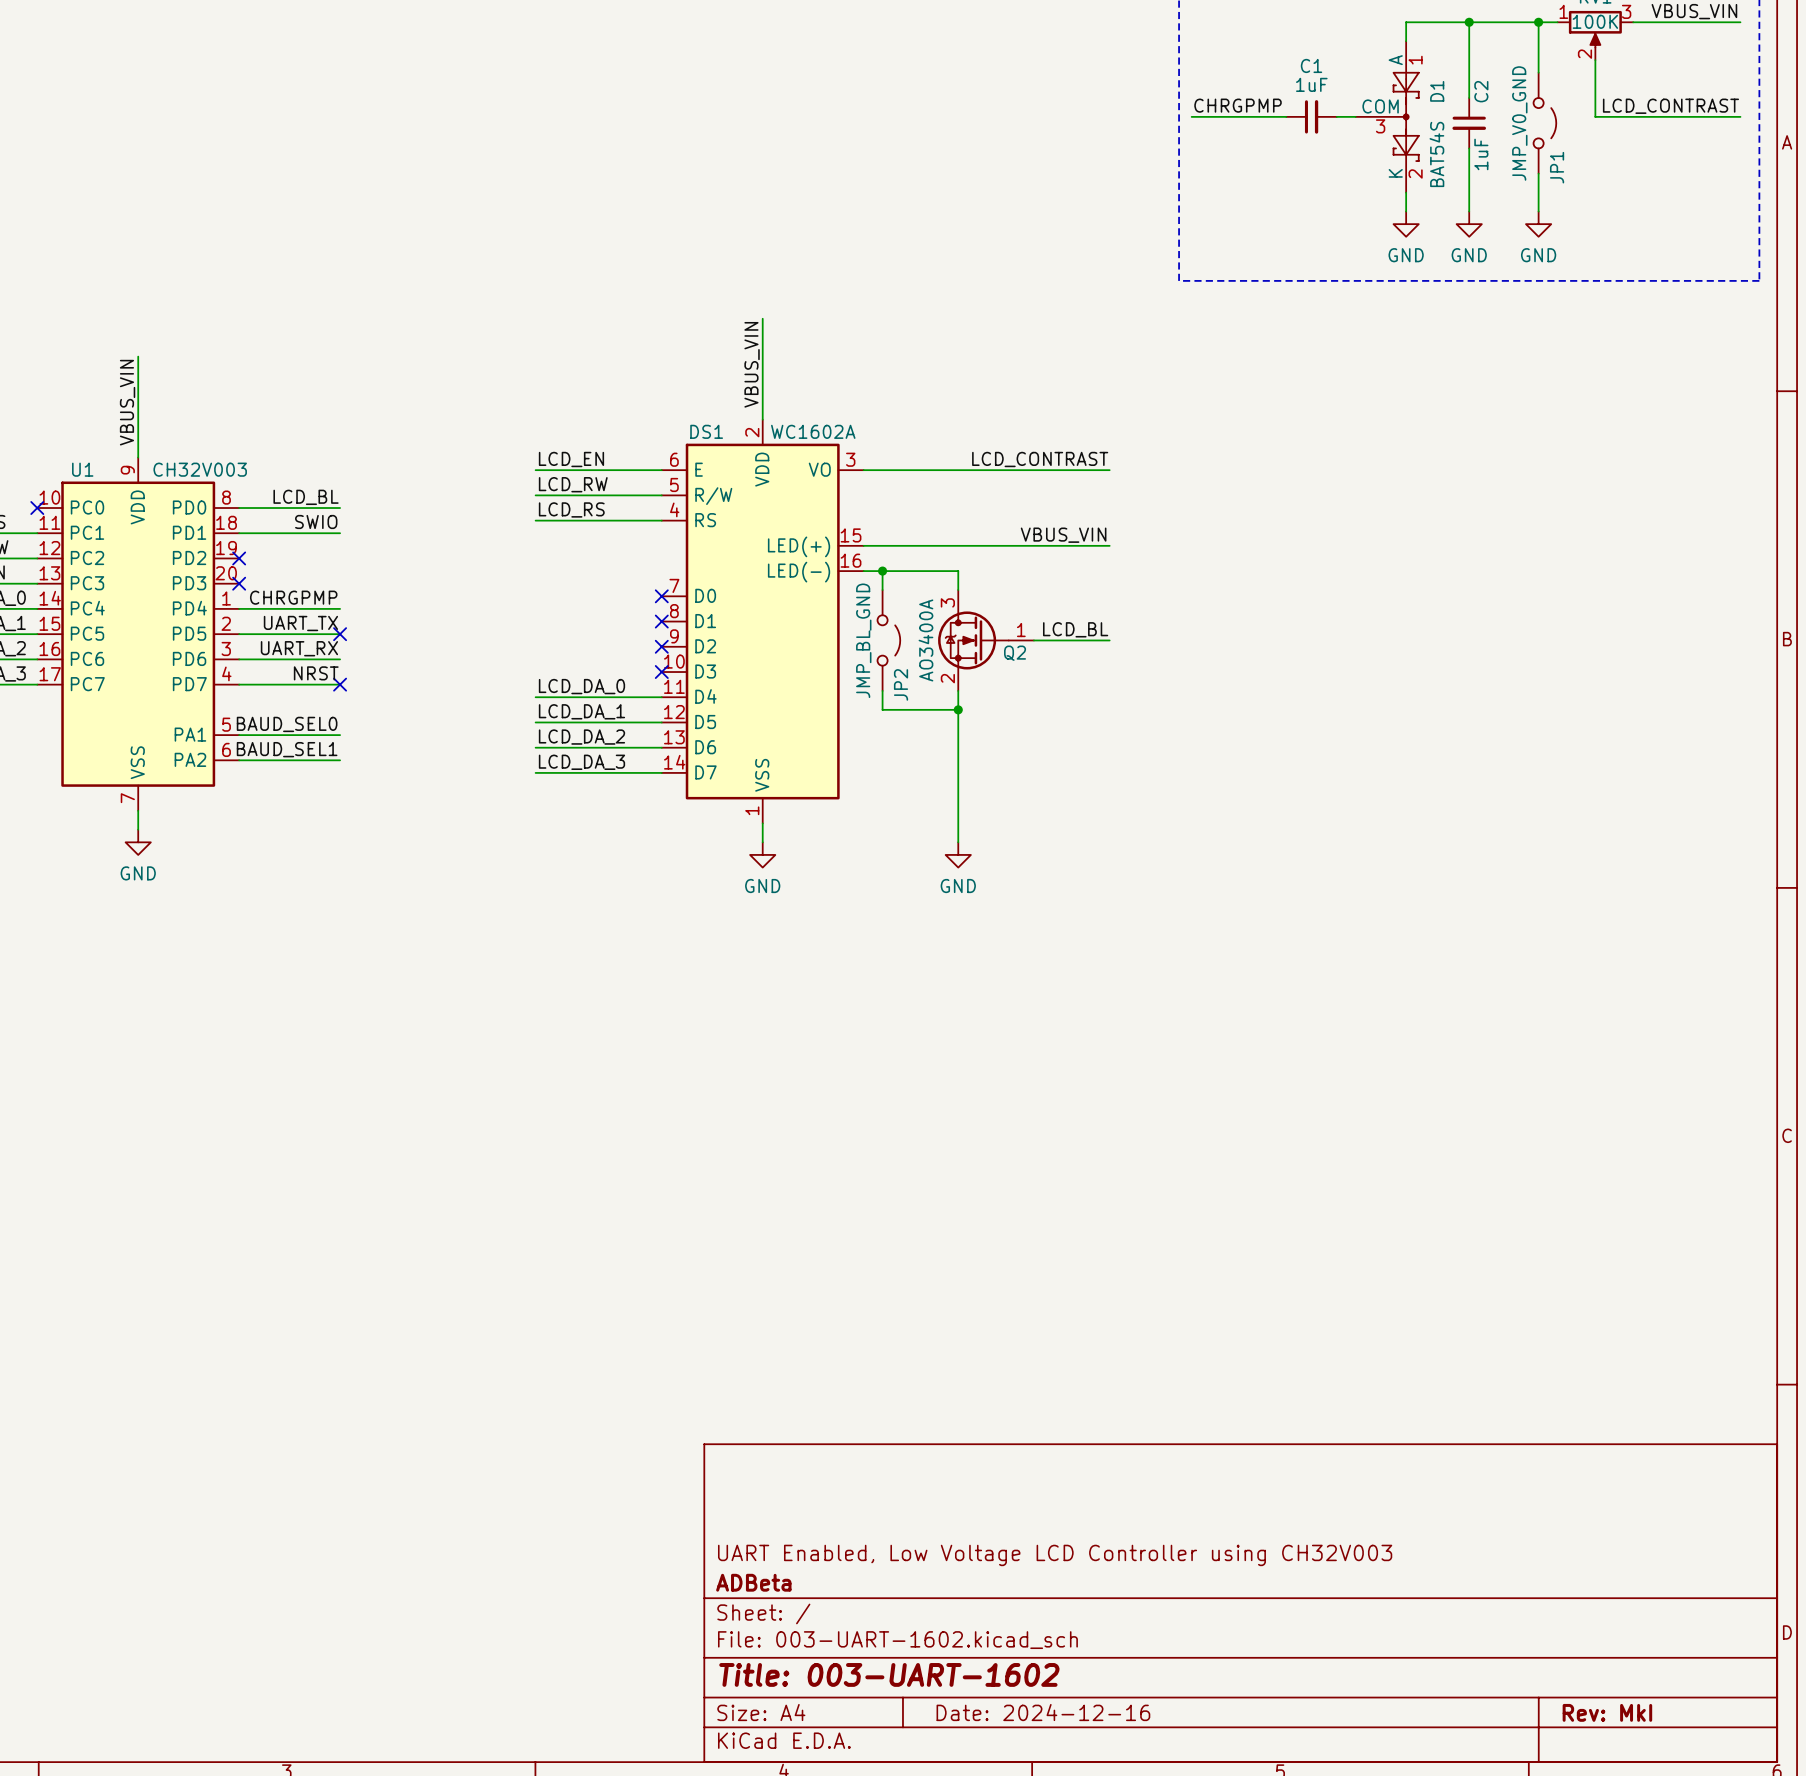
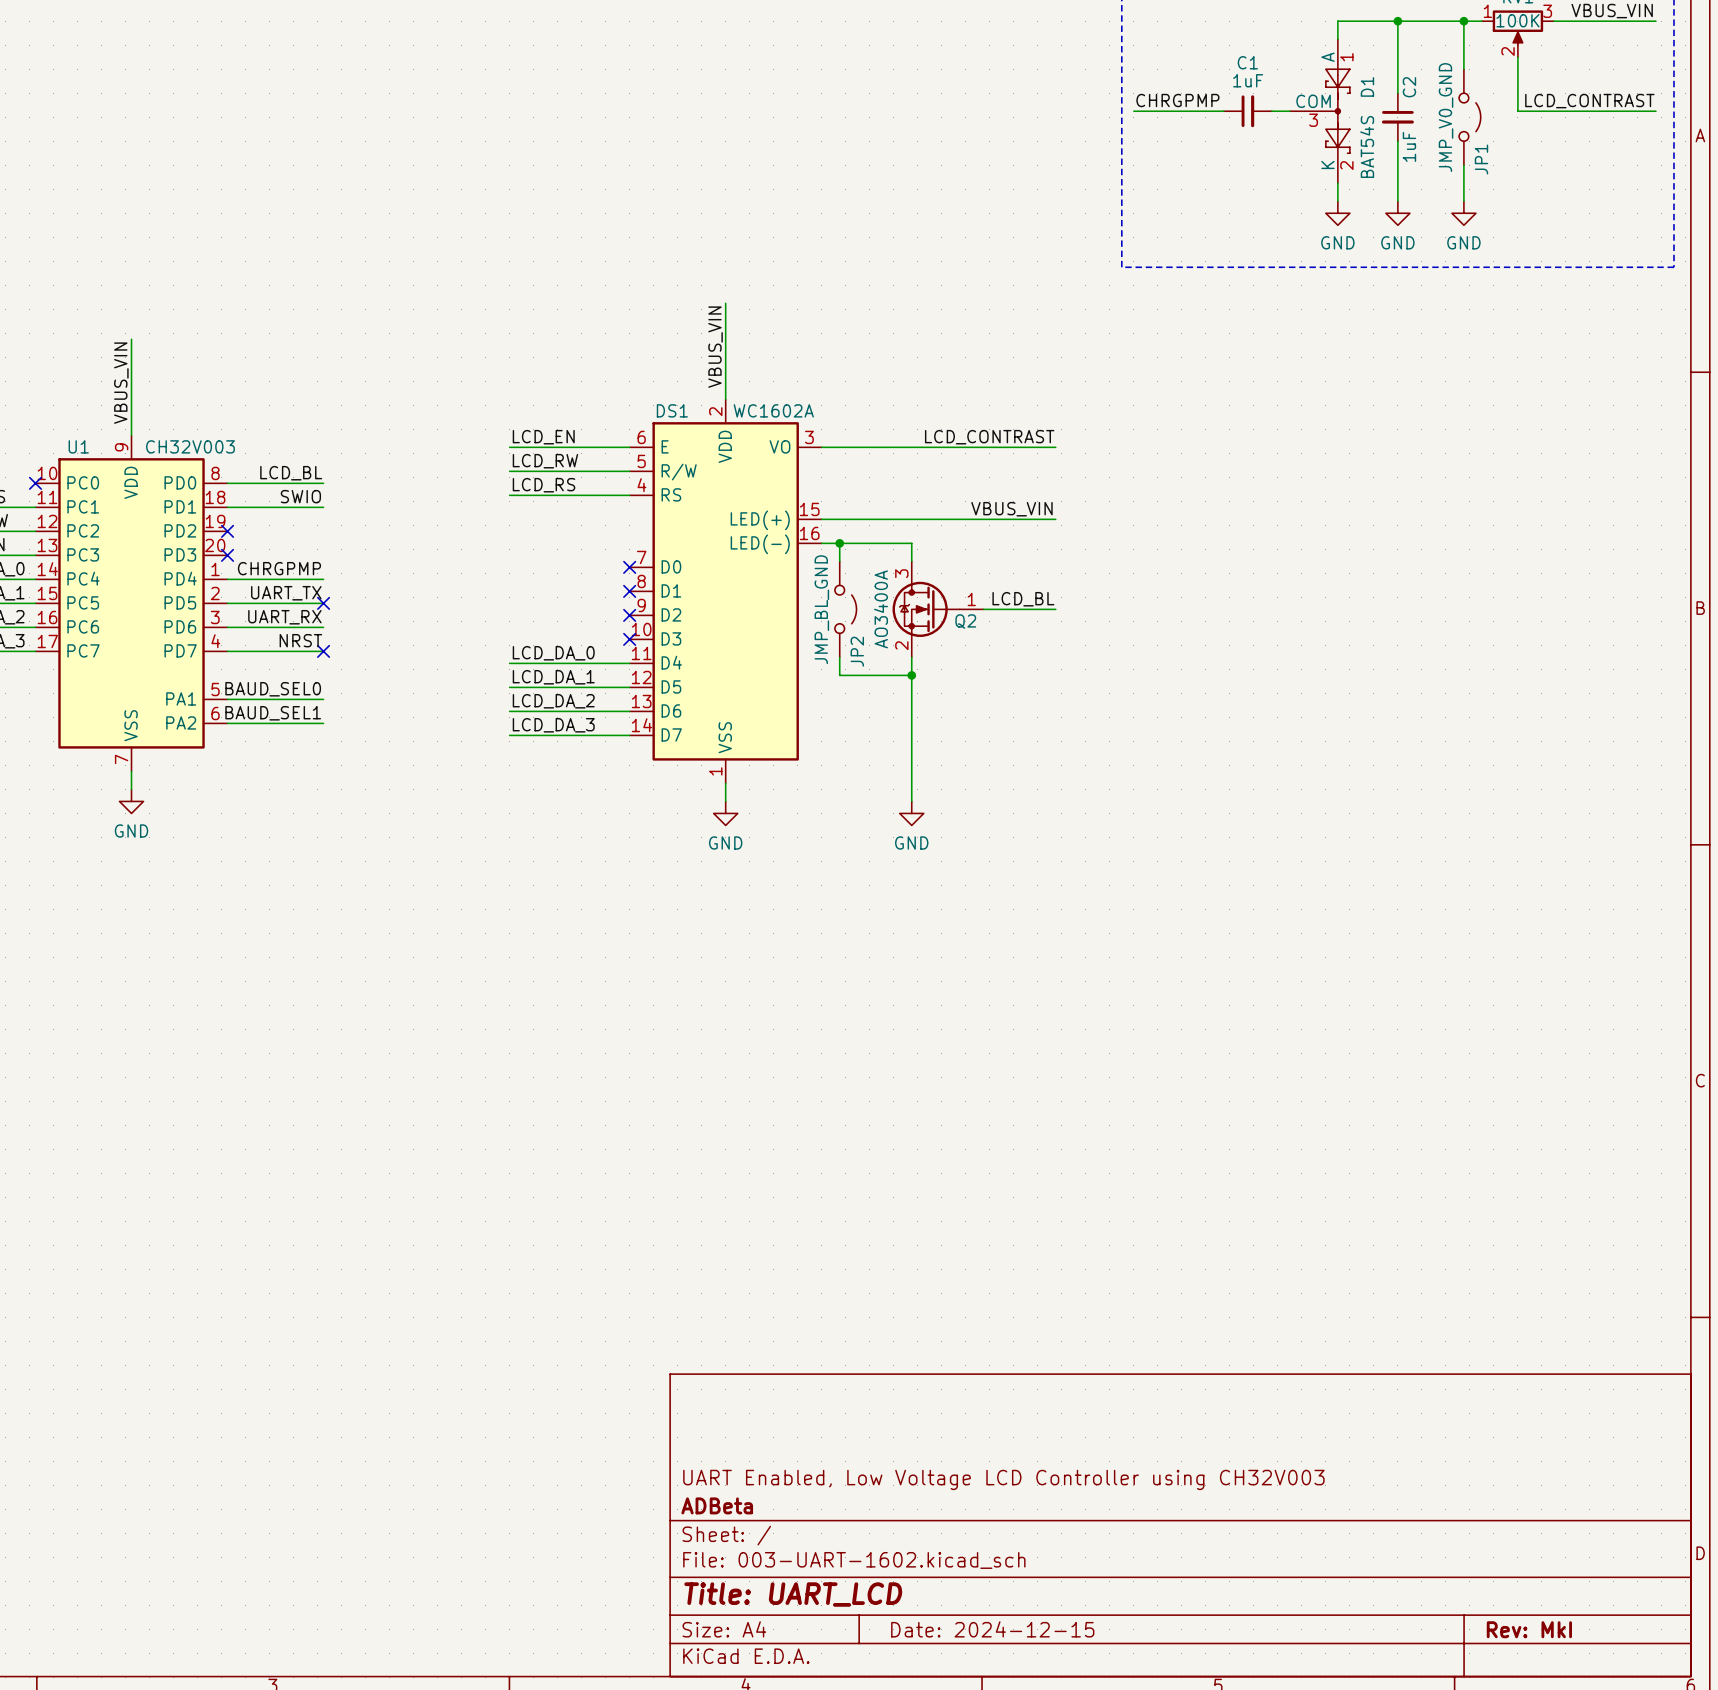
title block: Title: 003-UART-1602 (889, 1674) -> Title: UART_LCD (793, 1594)
title block: Date: 2024-12-16 (1043, 1712) -> Date: 2024-12-15 (992, 1629)

